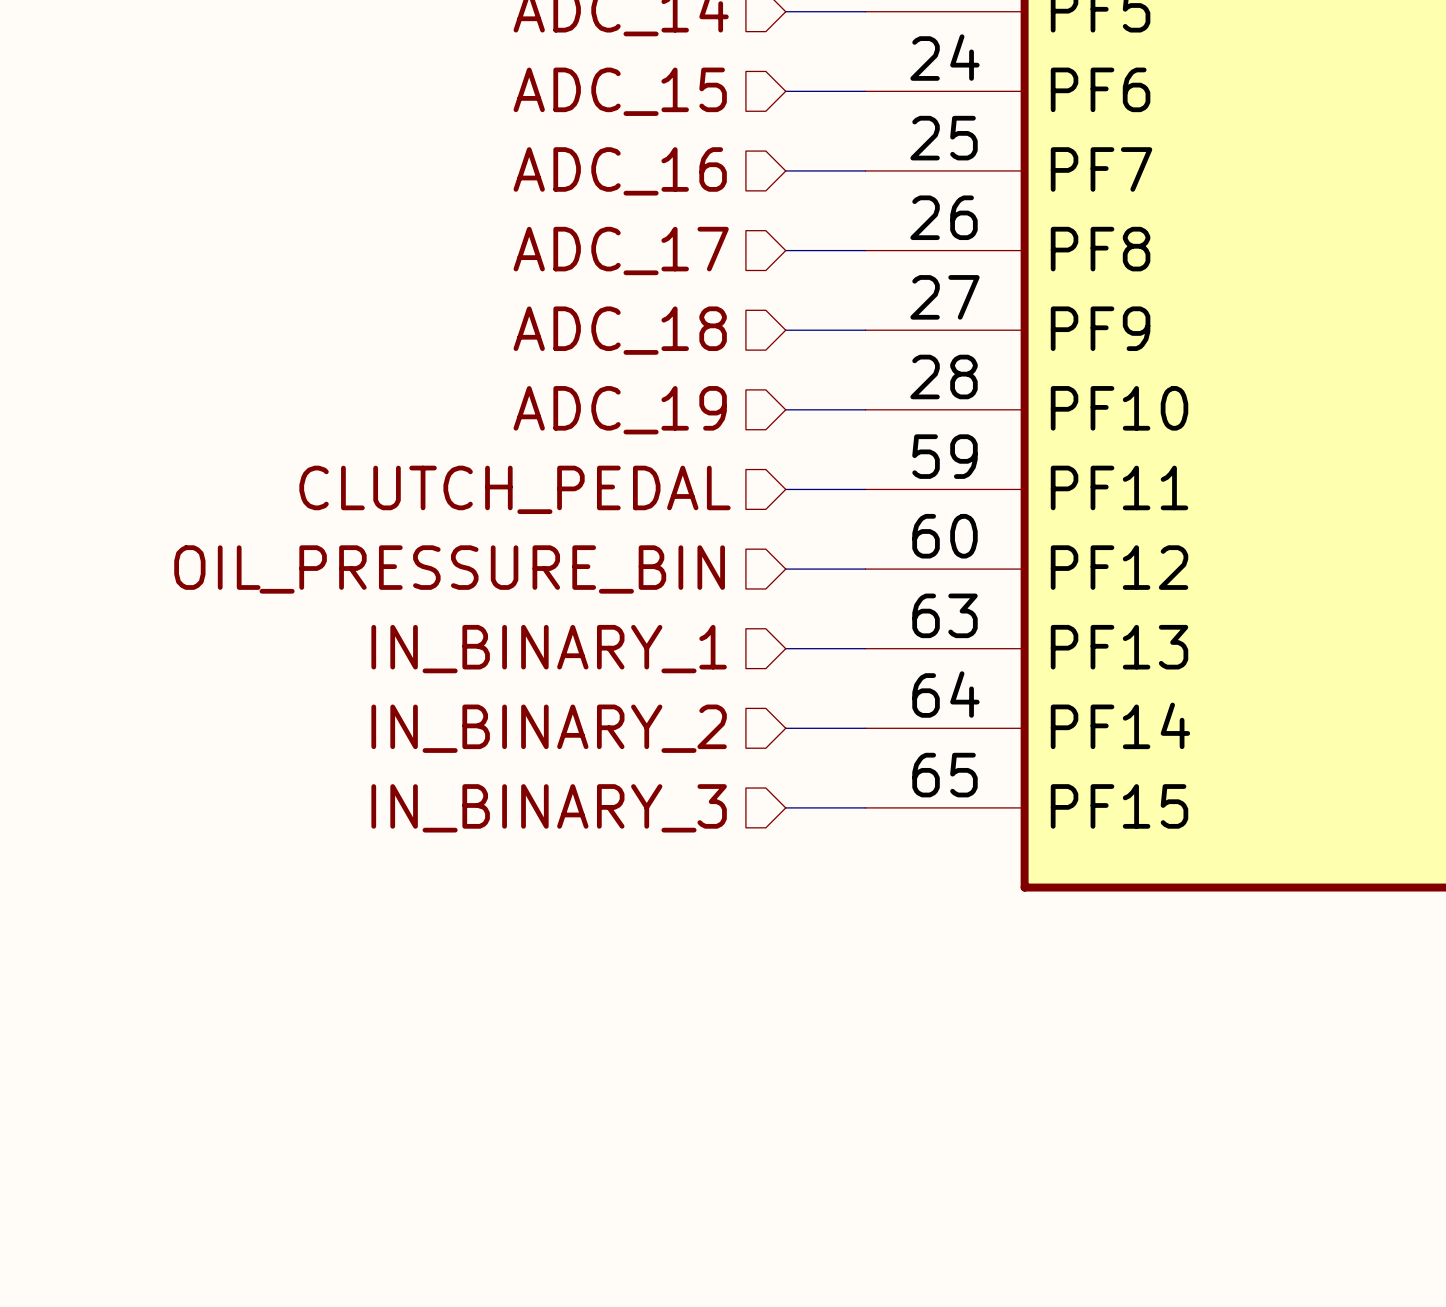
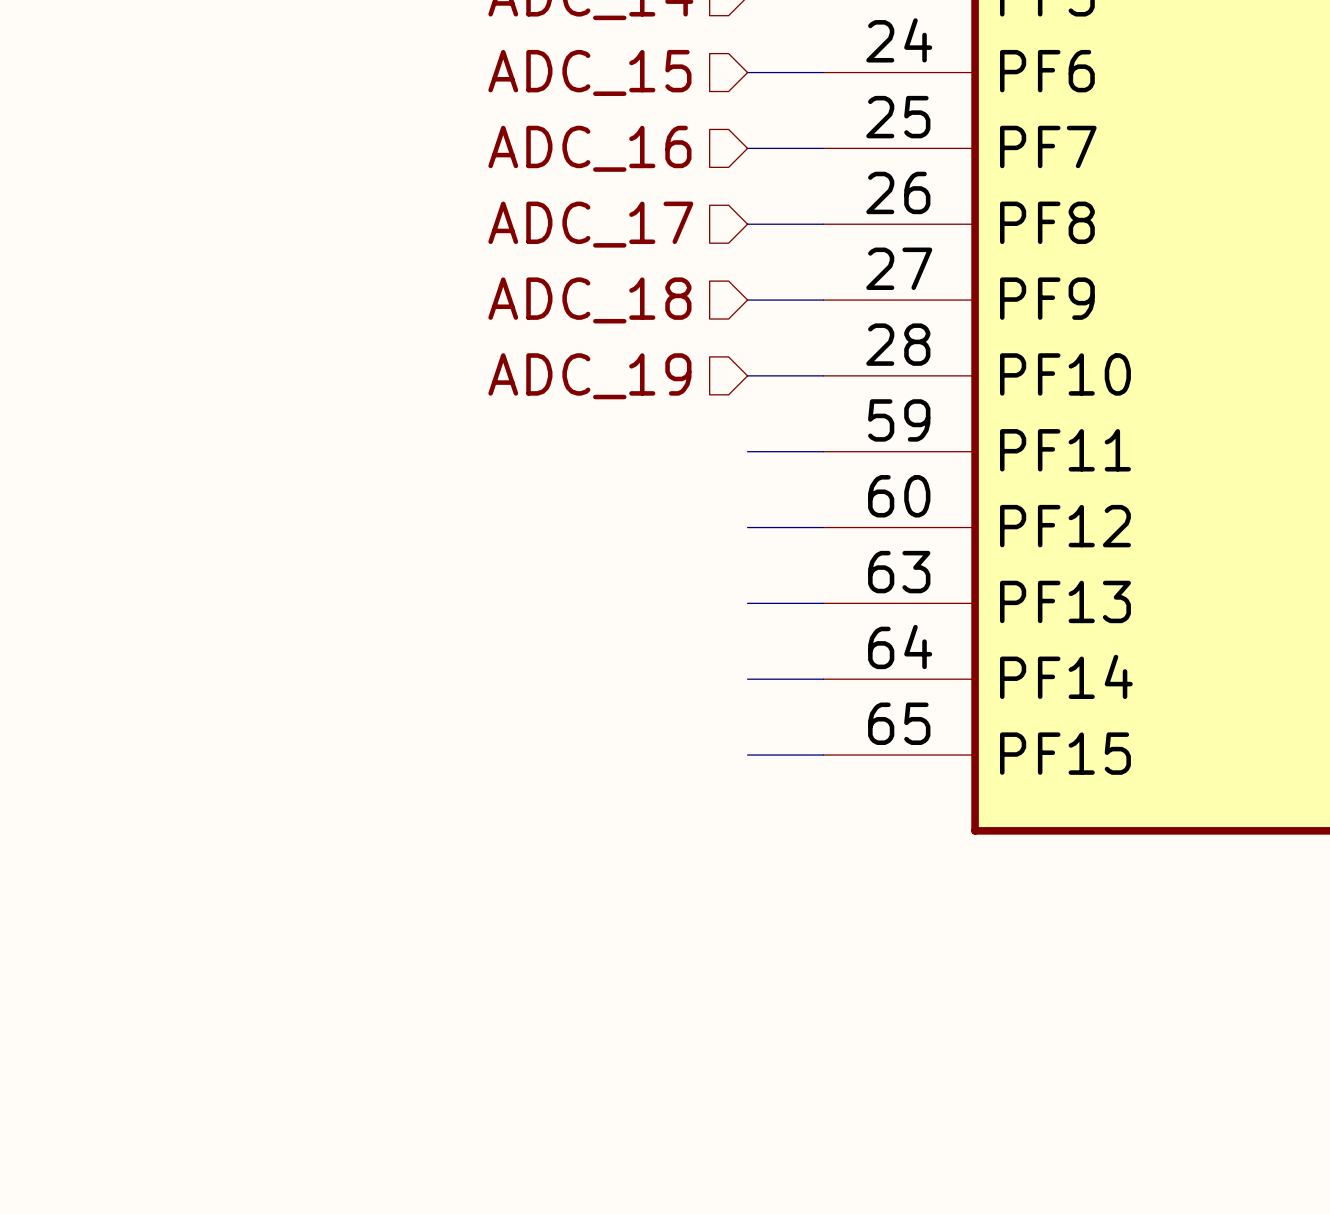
hierarchical label: CLUTCH_PEDAL (514, 489) -> none
hierarchical label: OIL_PRESSURE_BIN (449, 569) -> none
hierarchical label: IN_BINARY_1 (549, 649) -> none
hierarchical label: IN_BINARY_2 (549, 728) -> none
hierarchical label: IN_BINARY_3 (549, 808) -> none

